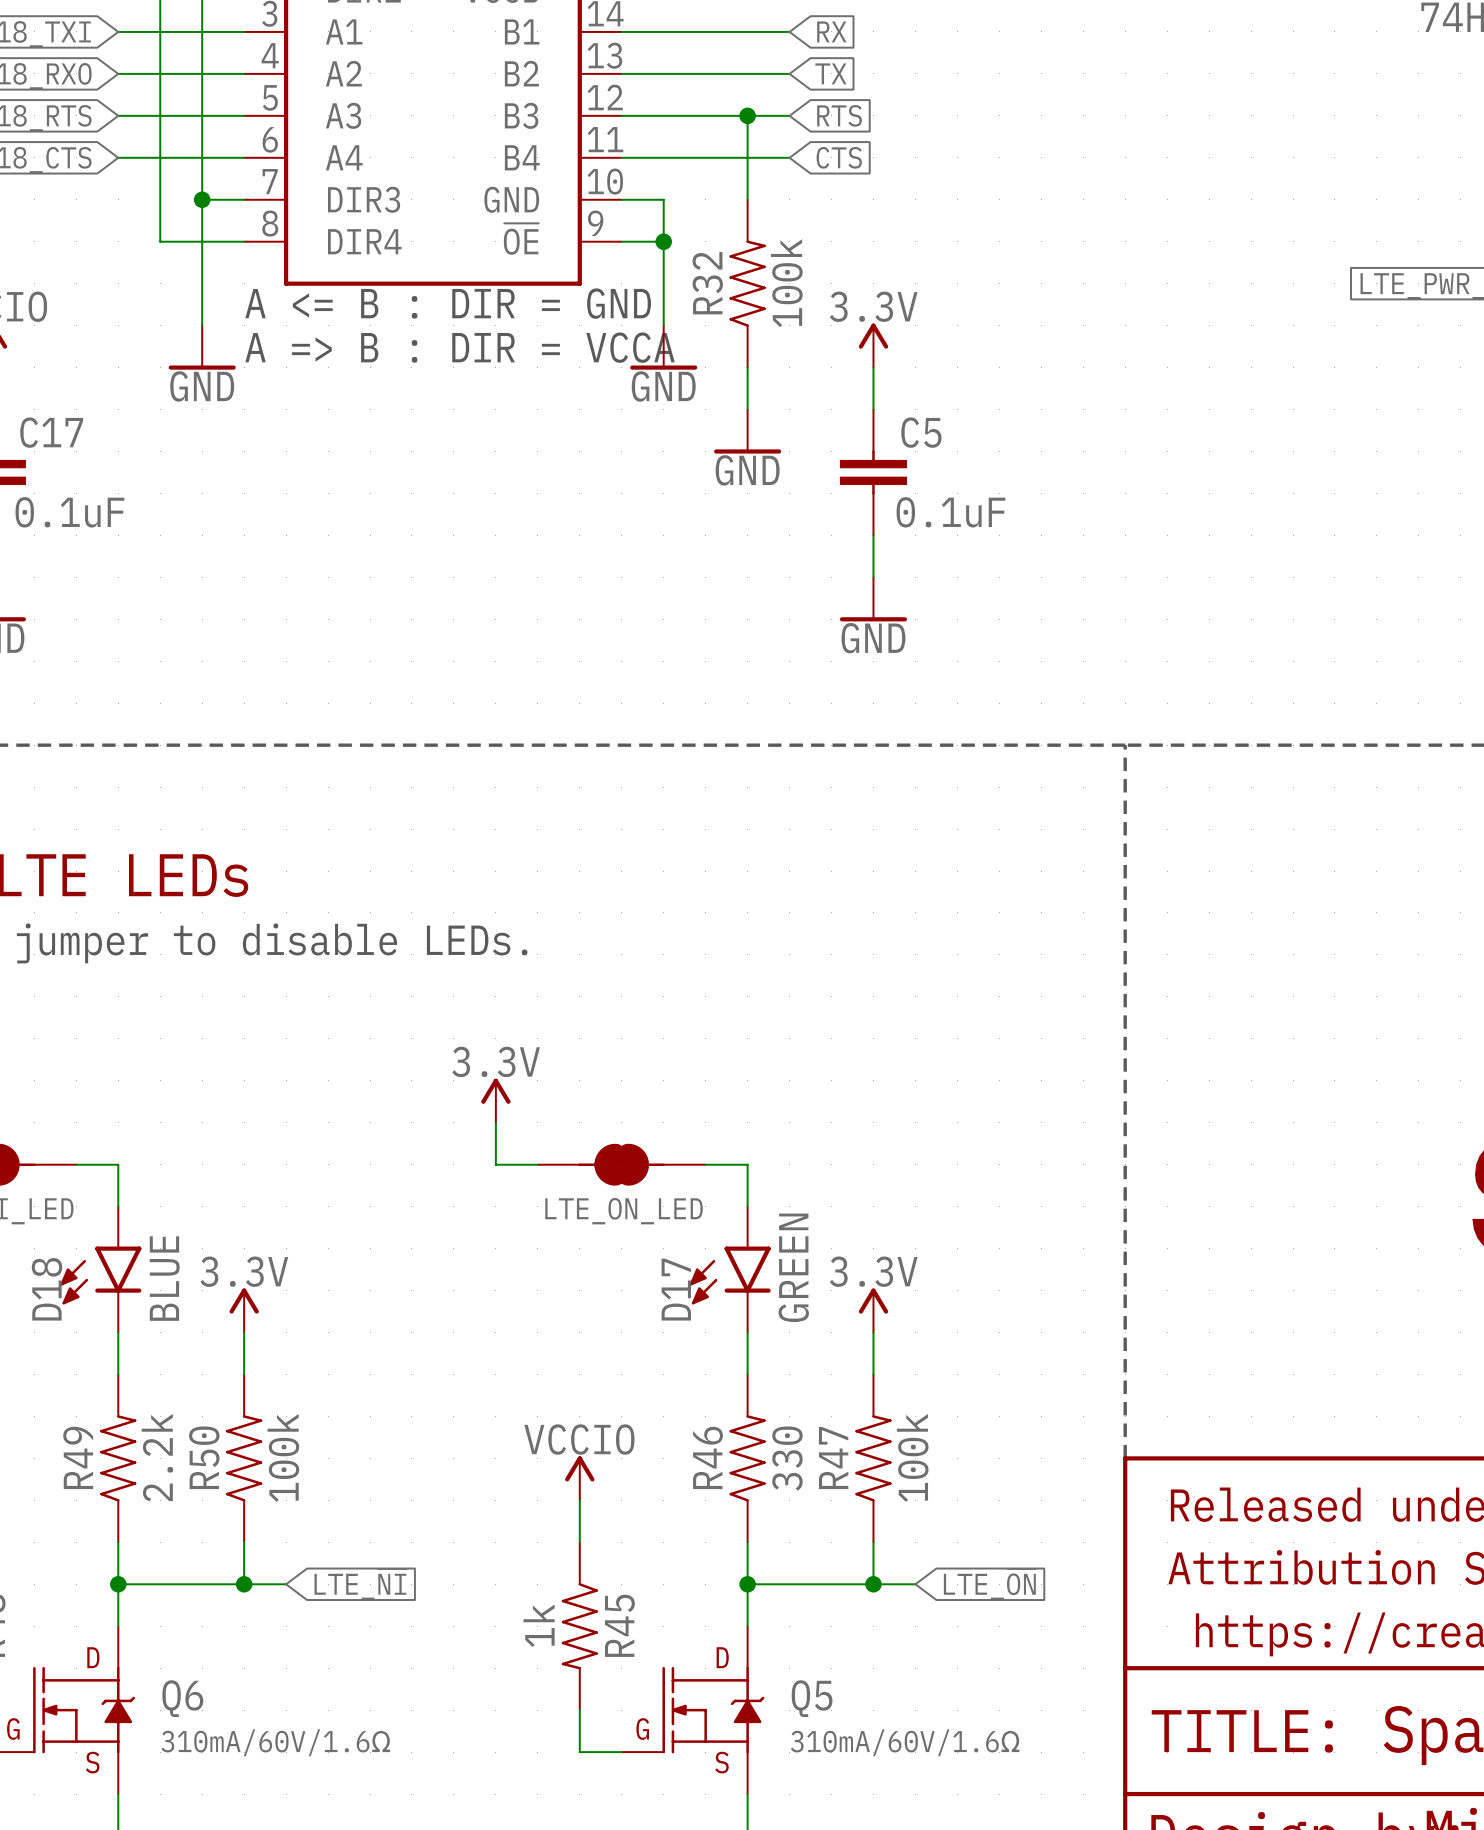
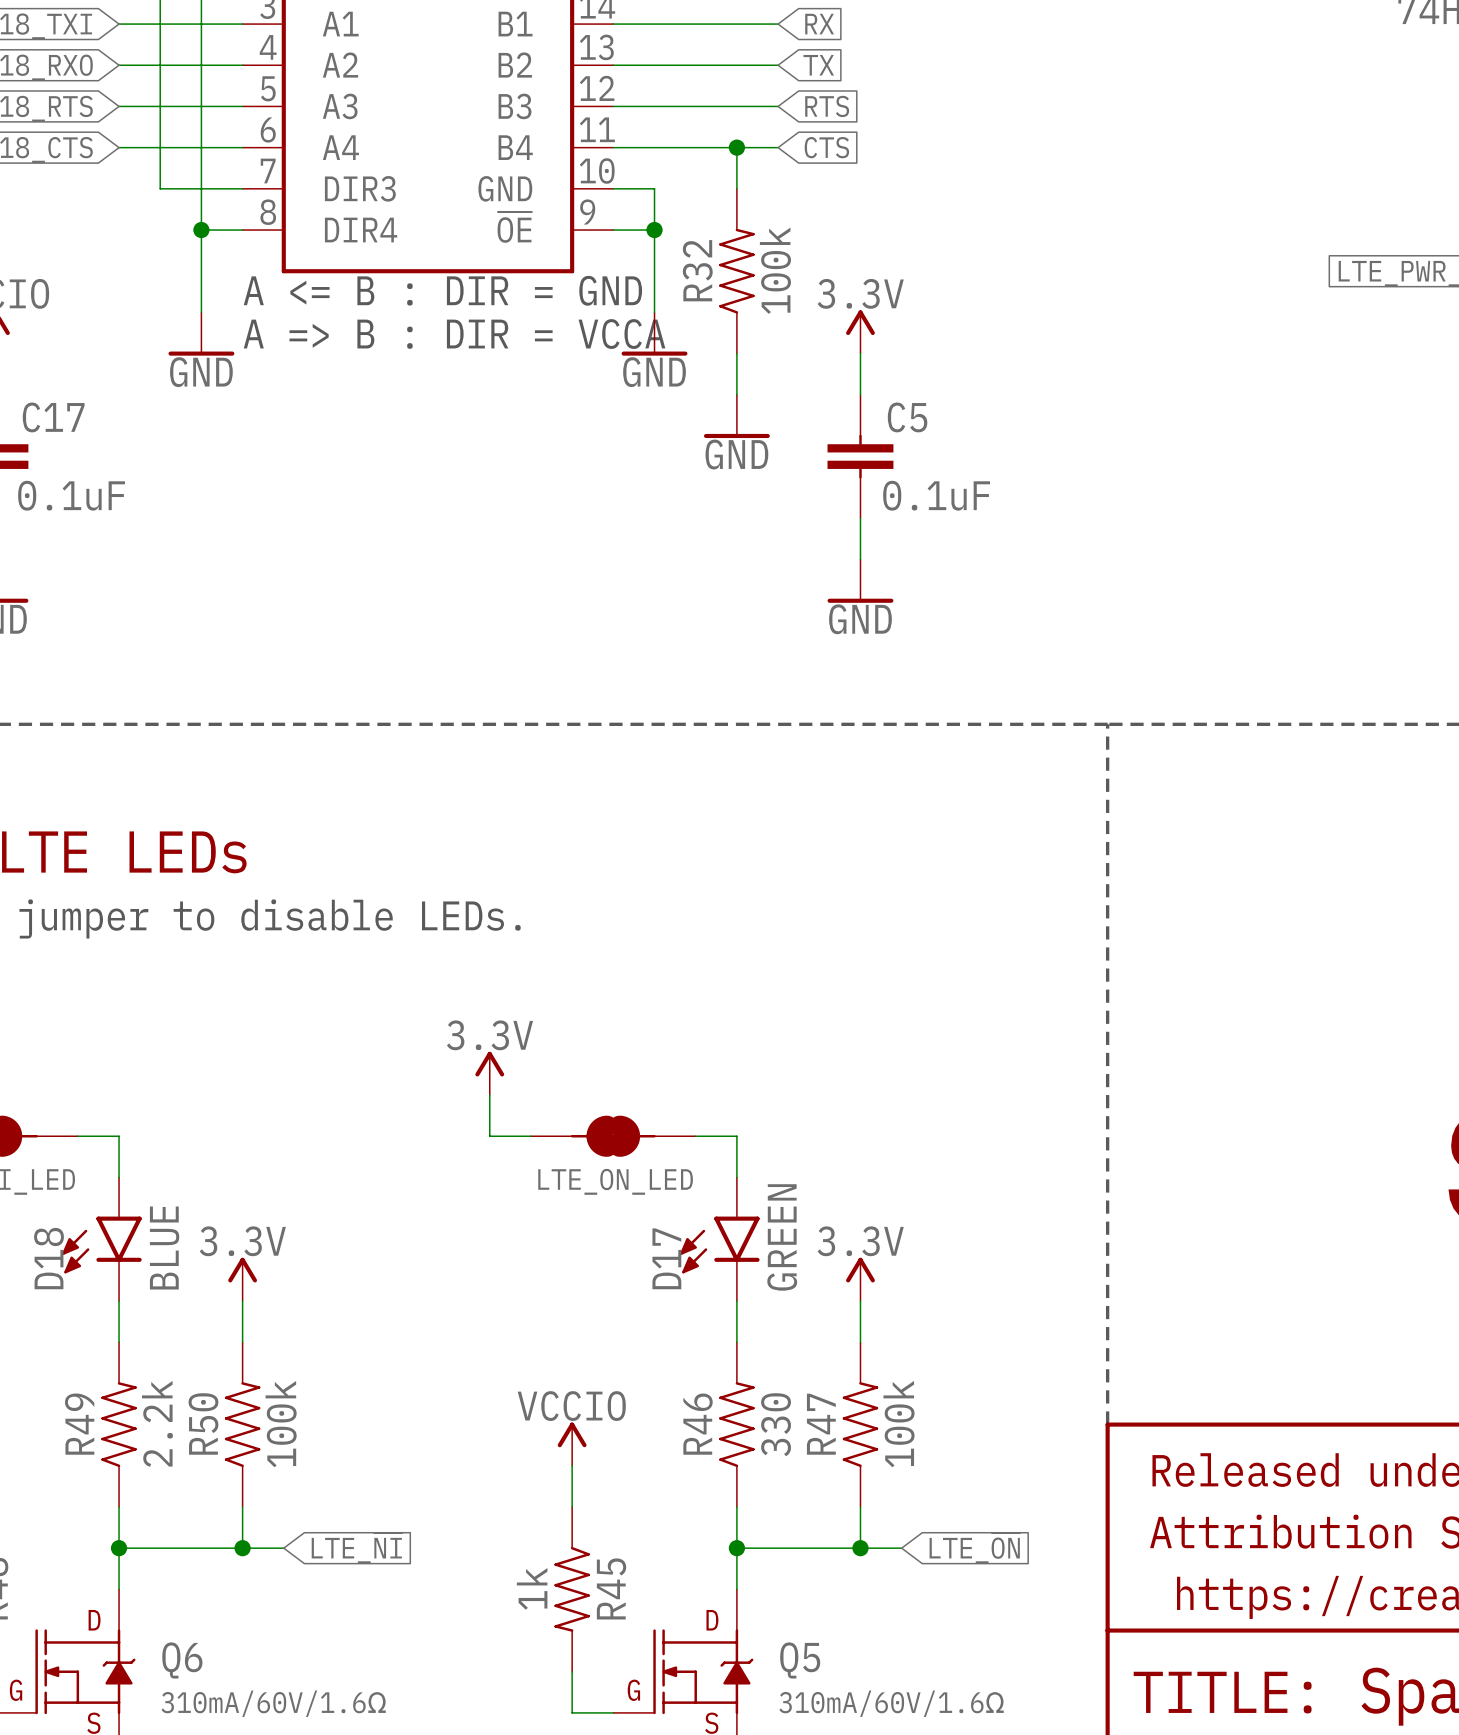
wire: (747, 115) (747, 157) -> none
junction position: (747, 115) -> (736, 147)
wire: (160, 199) (160, 241) (202, 241) -> (160, 188) (201, 188)
junction position: (202, 199) -> (201, 230)

